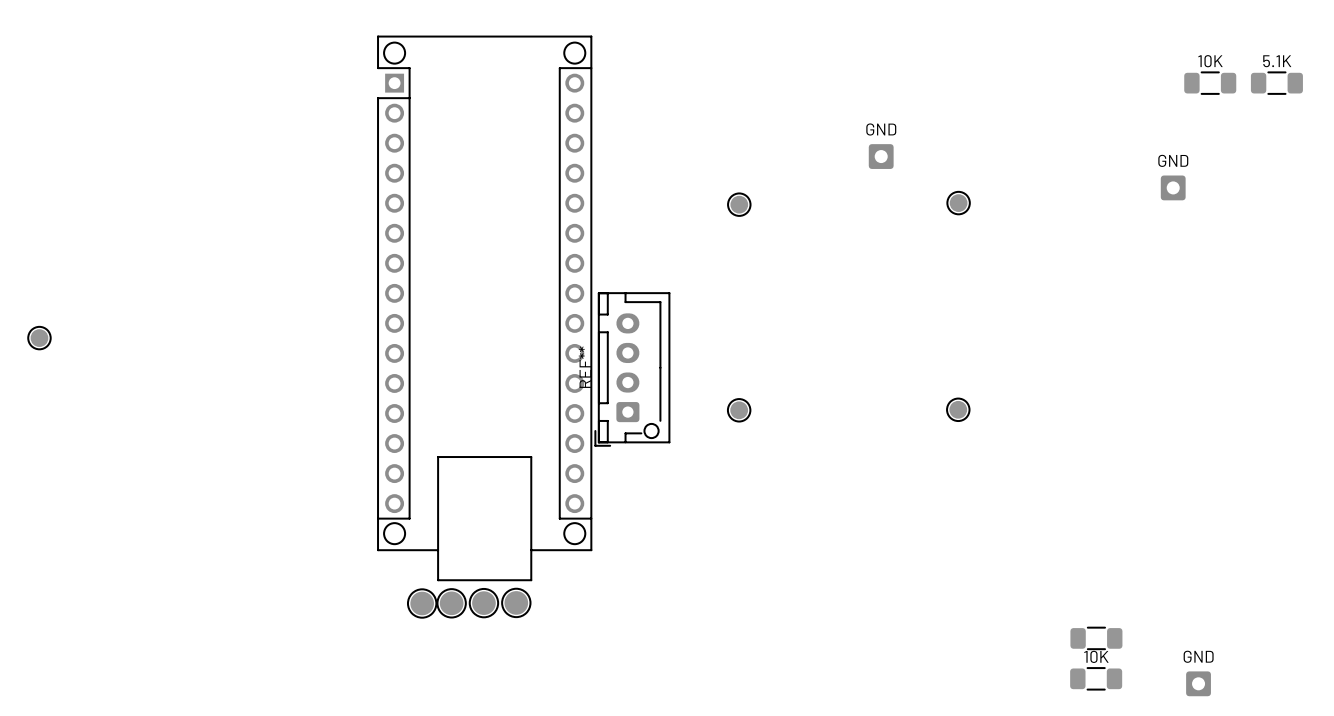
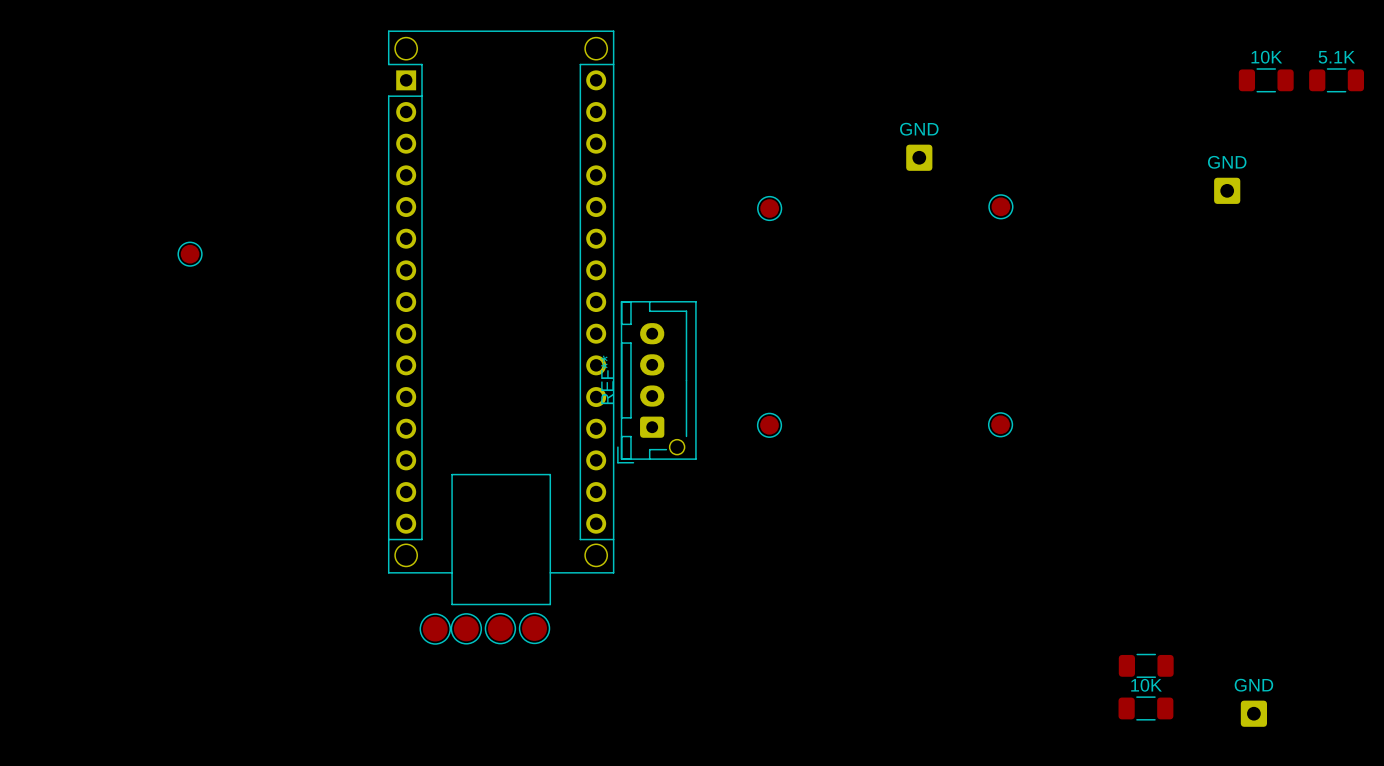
part position: (39, 338) -> (190, 254)

